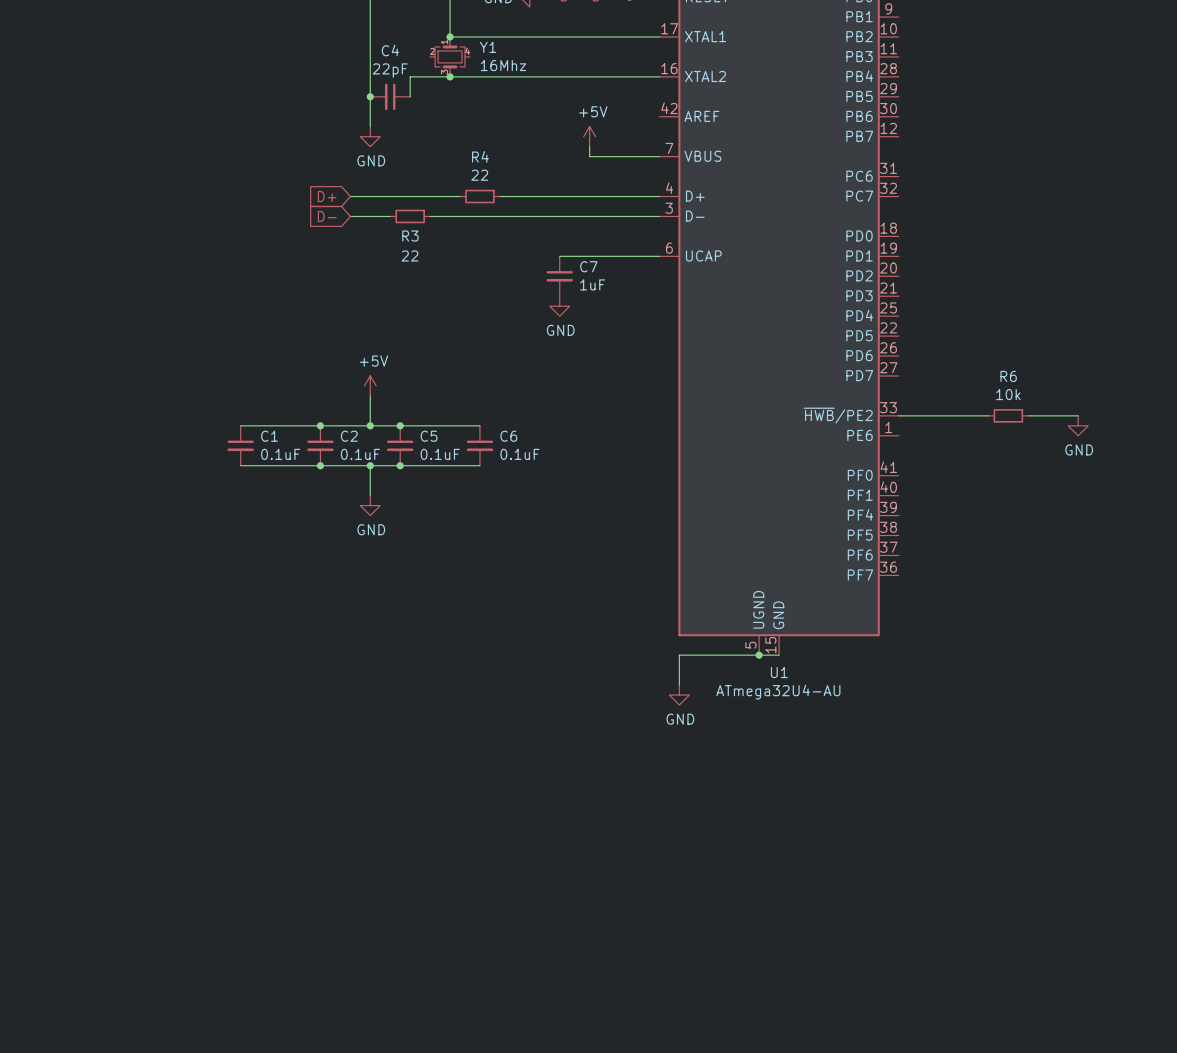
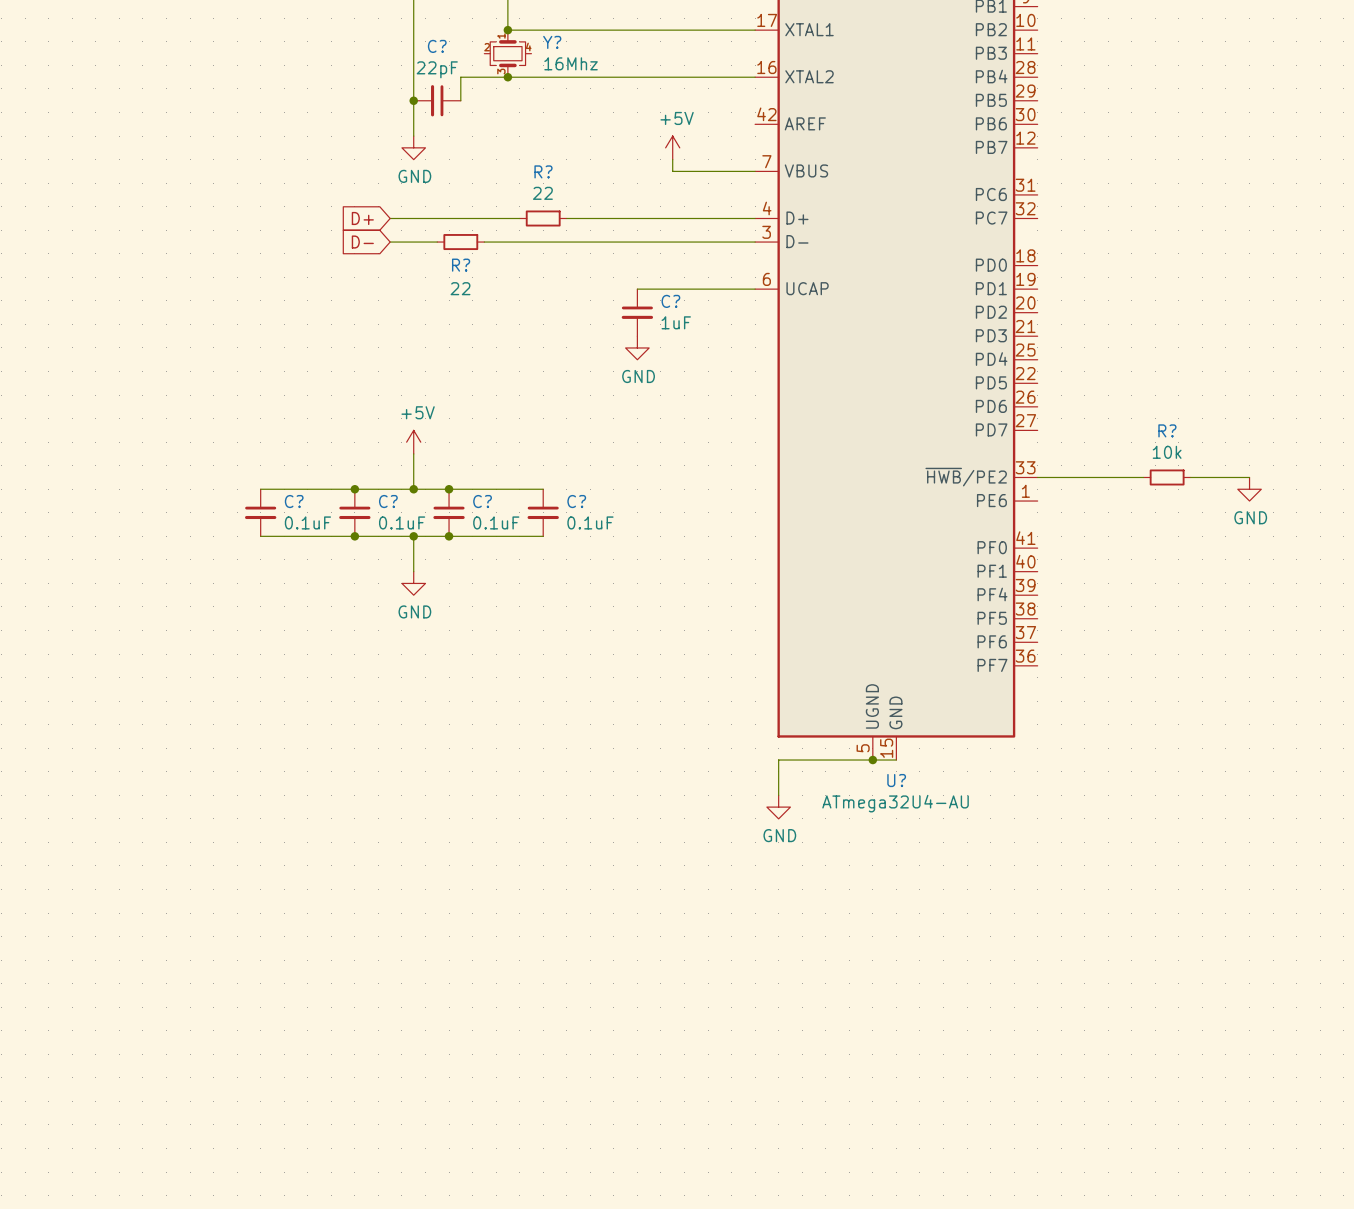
Y1 name: Y1 (488, 47) -> Y? (552, 42)
C4 name: C4 (390, 50) -> C? (437, 46)
R4 name: R4 (480, 156) -> R? (543, 171)
R3 name: R3 (410, 236) -> R? (461, 265)
C7 name: C7 (588, 266) -> C? (670, 301)
R6 name: R6 (1008, 376) -> R? (1167, 430)
C1 name: C1 (269, 436) -> C? (294, 501)
C2 name: C2 (349, 436) -> C? (388, 501)
C5 name: C5 (429, 436) -> C? (482, 501)
C6 name: C6 (508, 436) -> C? (576, 501)
U1 name: U1 (779, 672) -> U? (896, 780)

